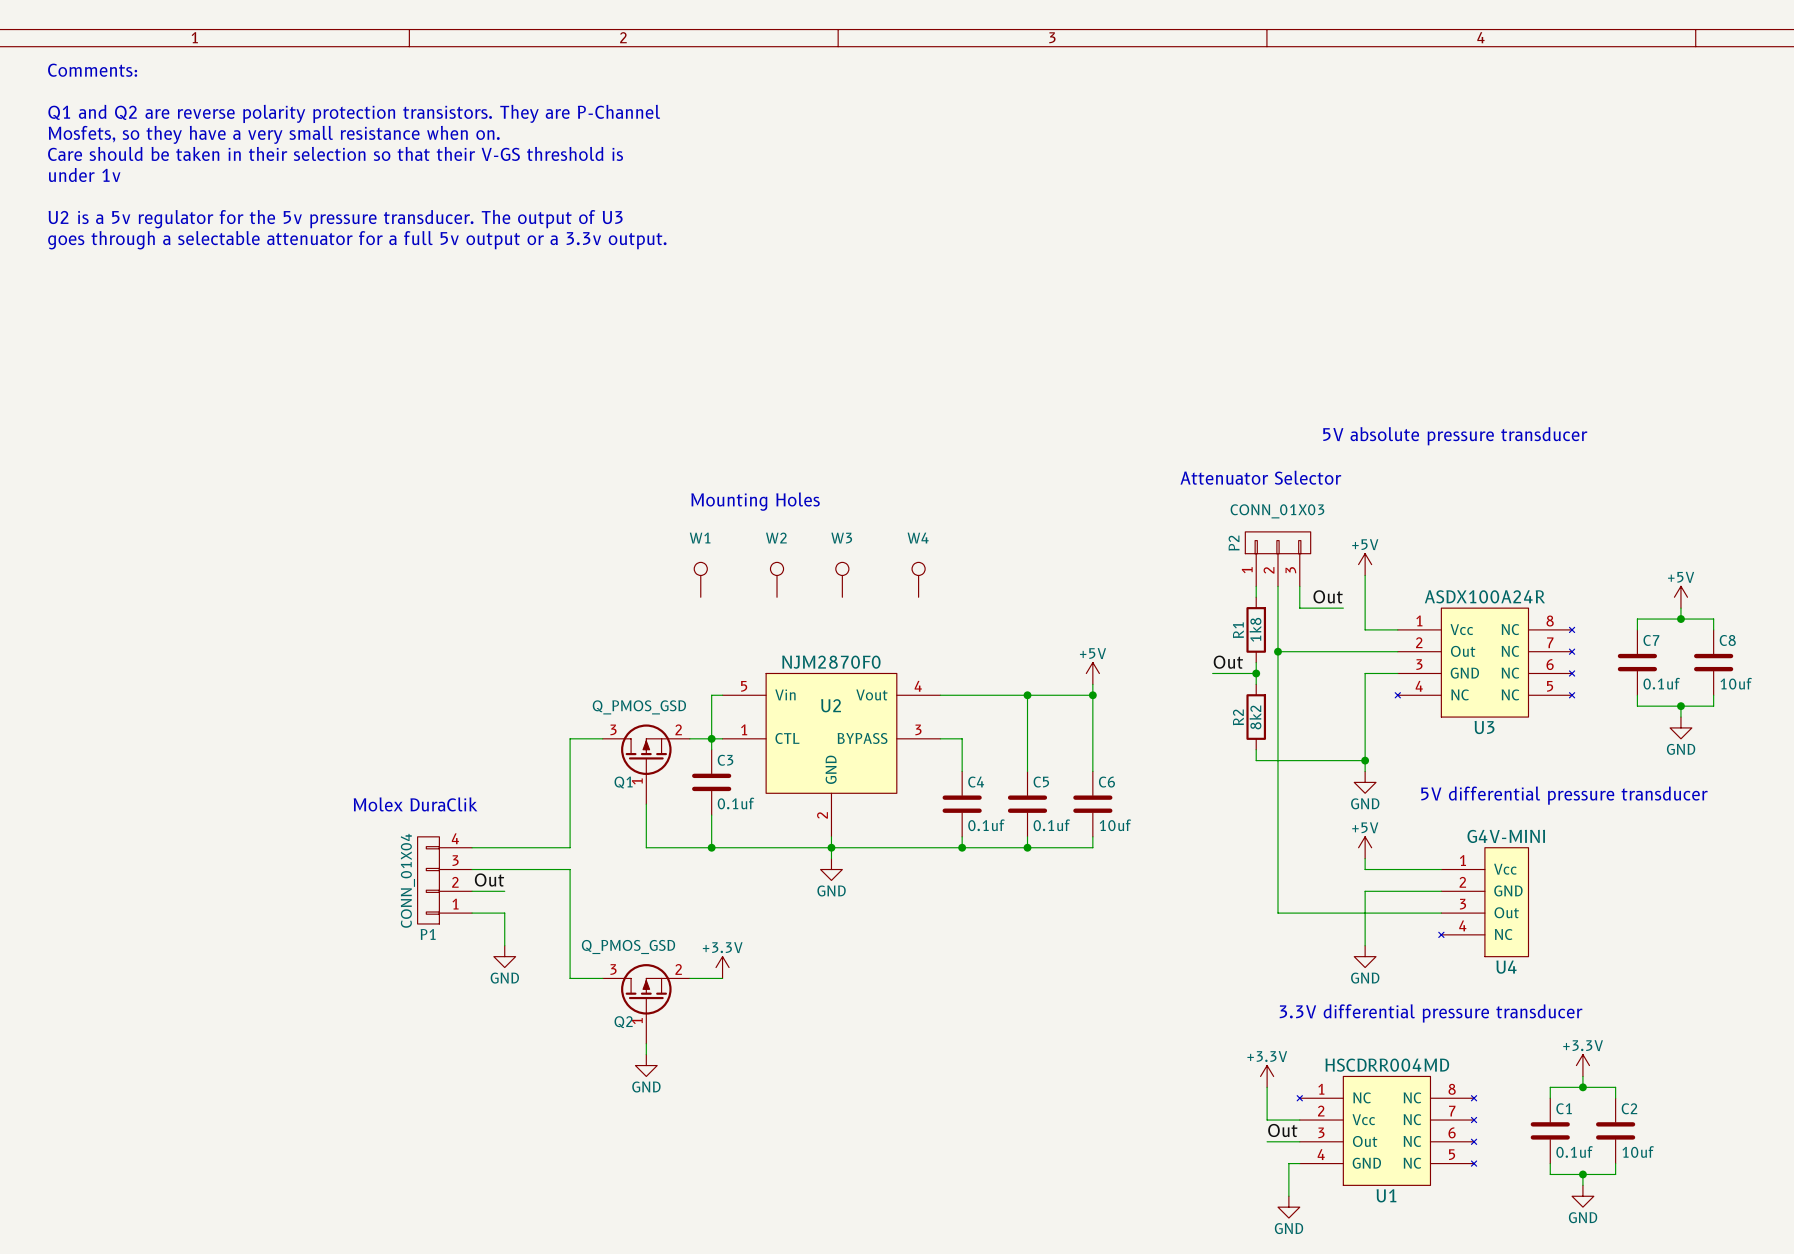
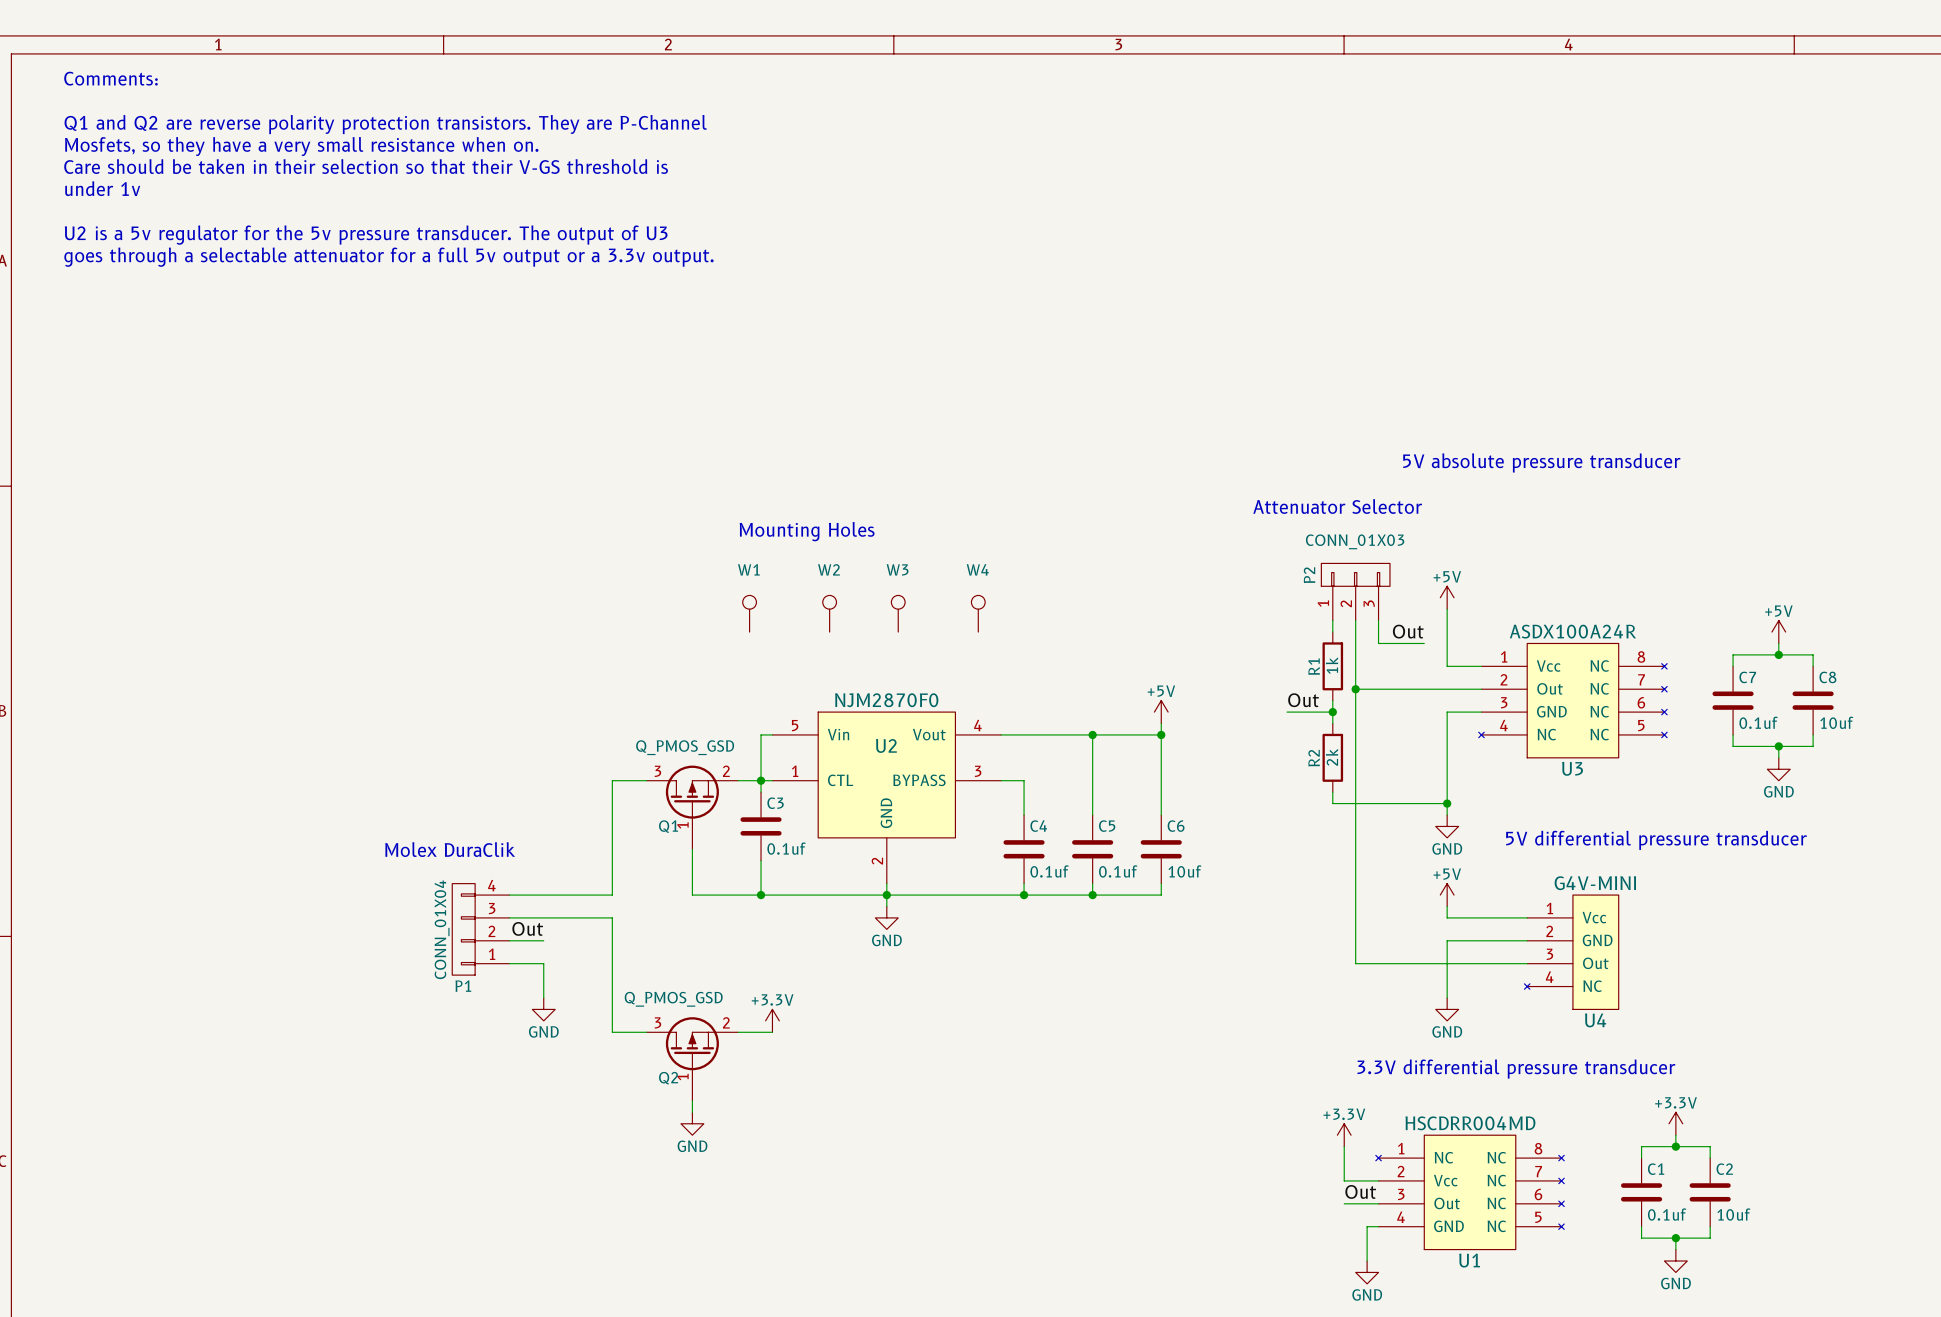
R1 value: 1k8 (1255, 629) -> 1k (1331, 665)
R2 value: 8k2 (1255, 717) -> 2k (1331, 757)

